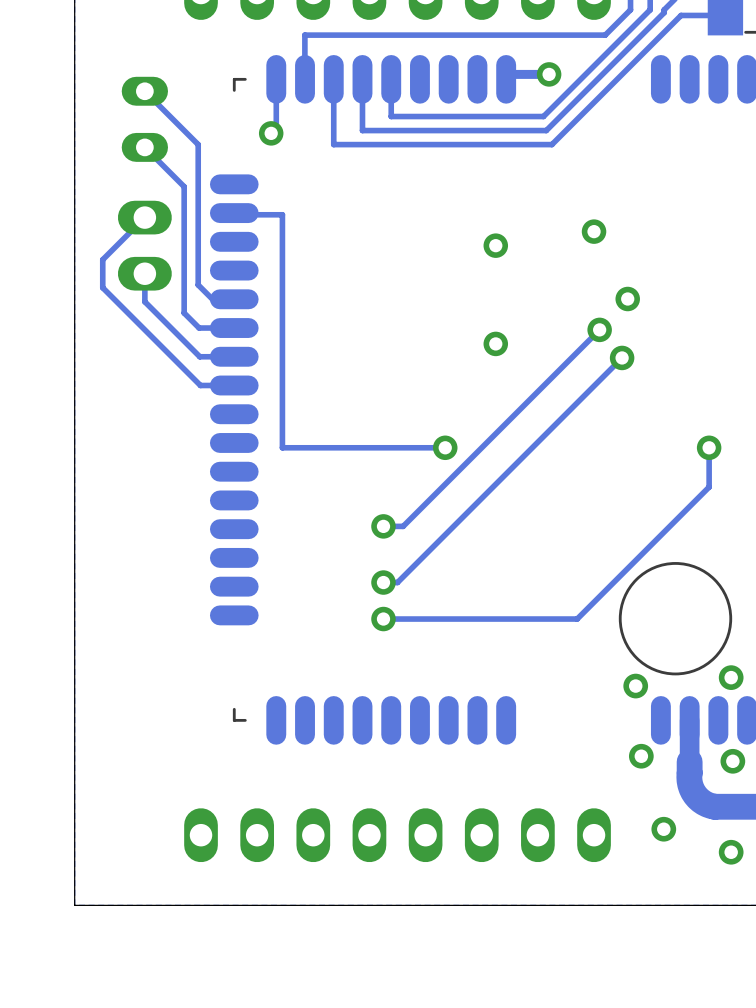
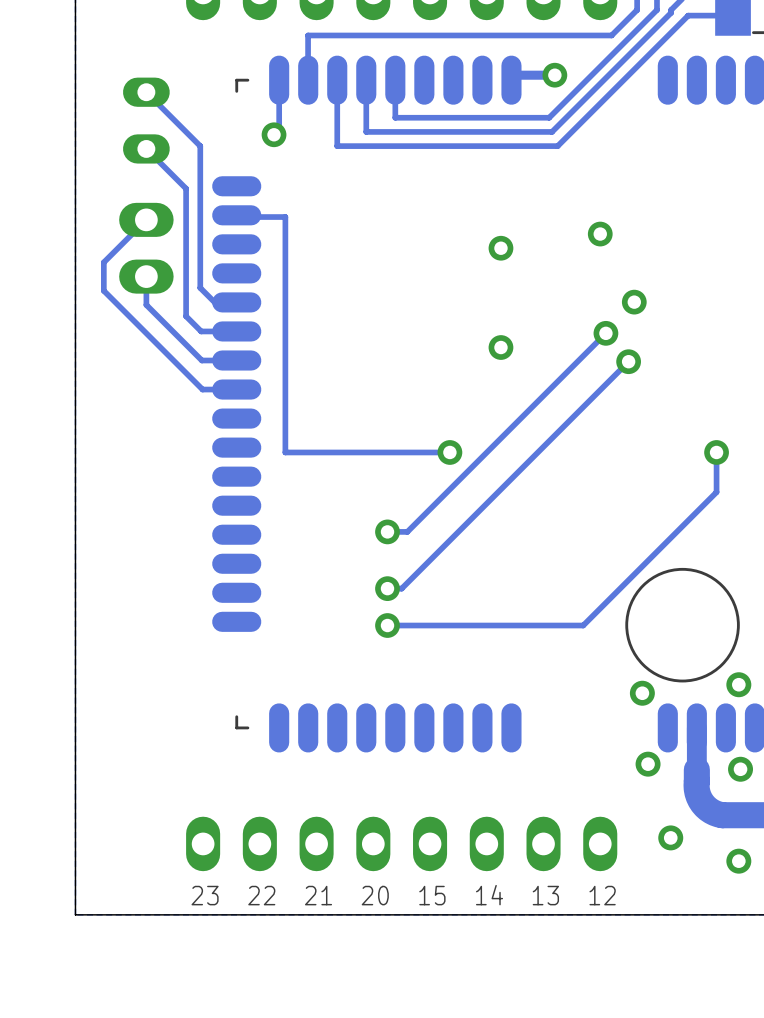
text: none -> 14 (489, 895)
text: none -> 23 (205, 895)
text: none -> 22 (261, 895)
text: none -> 21 (318, 895)
text: none -> 20 (375, 895)
text: none -> 15 (432, 895)
text: none -> 13 (545, 895)
text: none -> 12 (602, 895)

